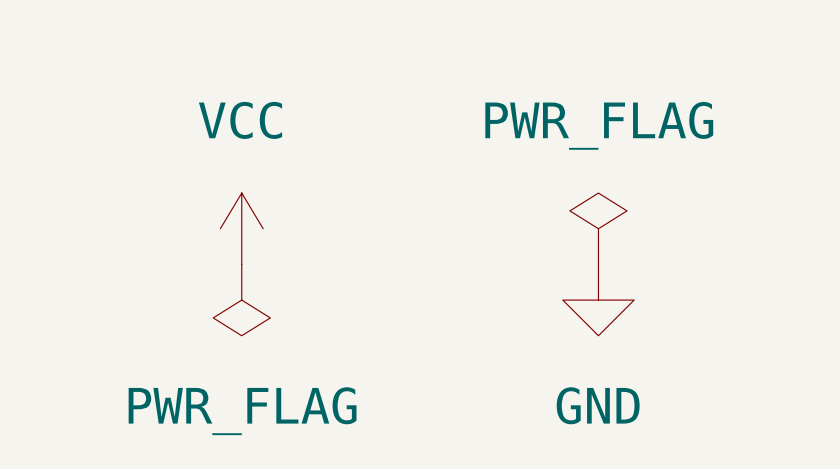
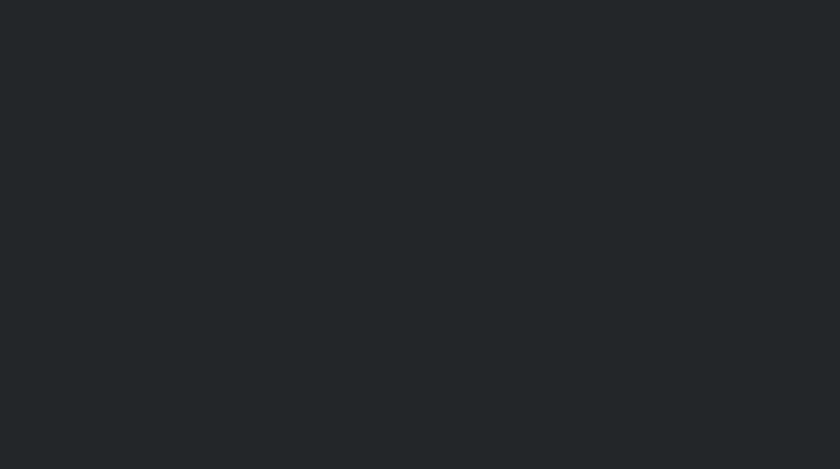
power symbol: VCC (241, 228) -> none
power symbol: PWR_FLAG (598, 228) -> none
power symbol: PWR_FLAG (241, 300) -> none
power symbol: GND (598, 300) -> none

